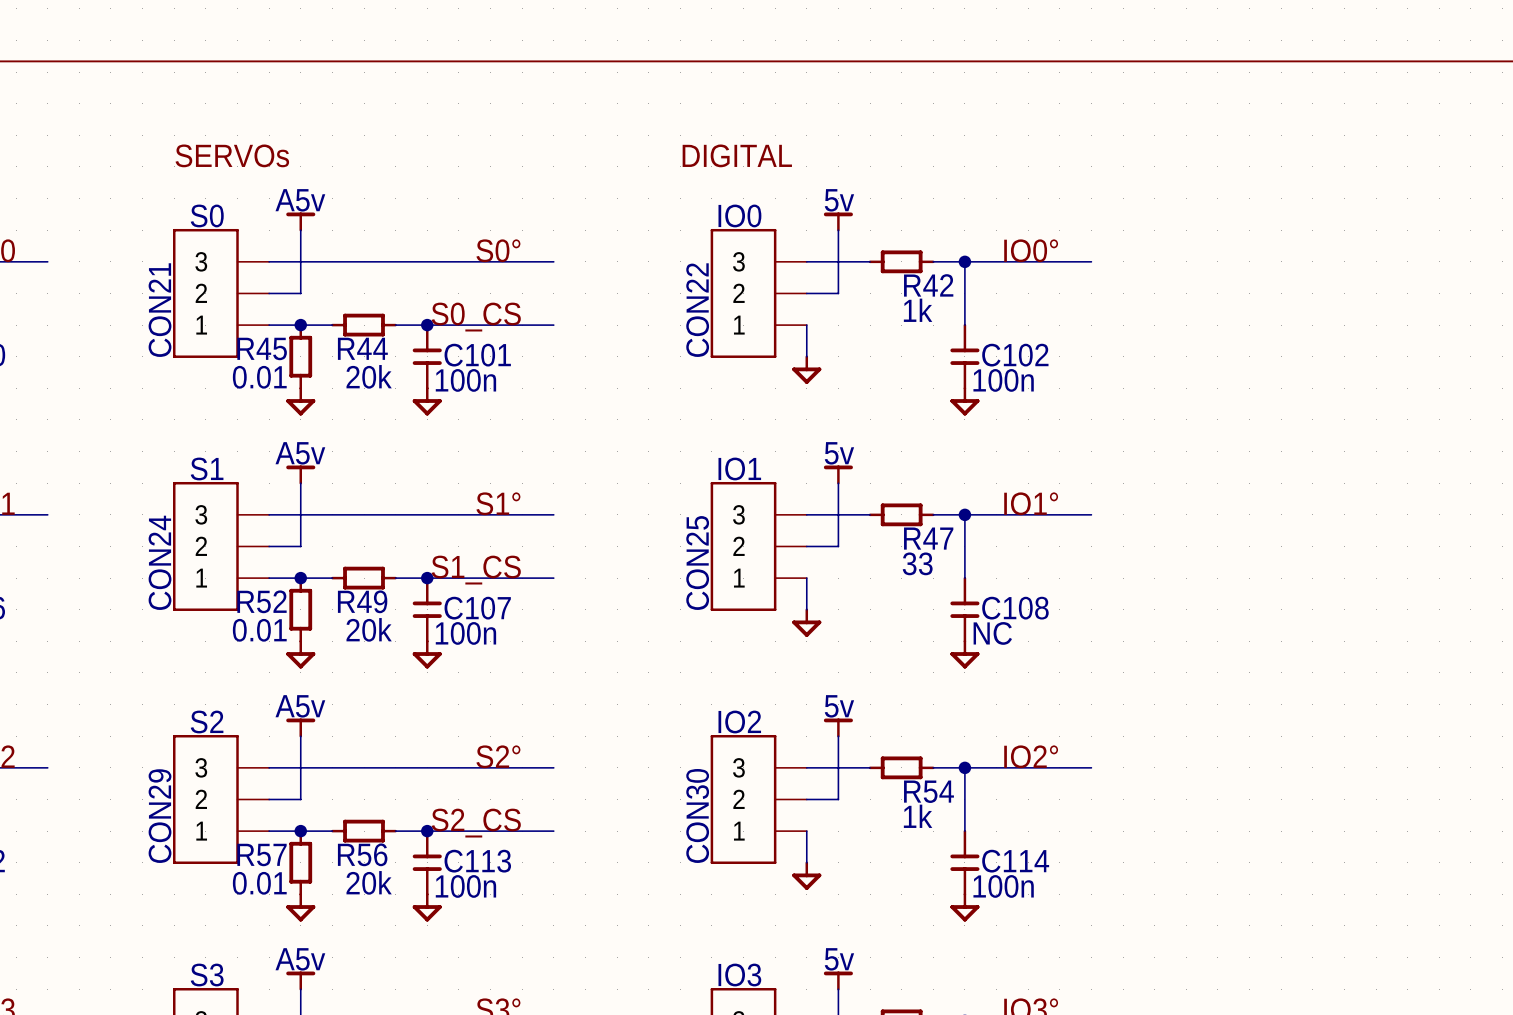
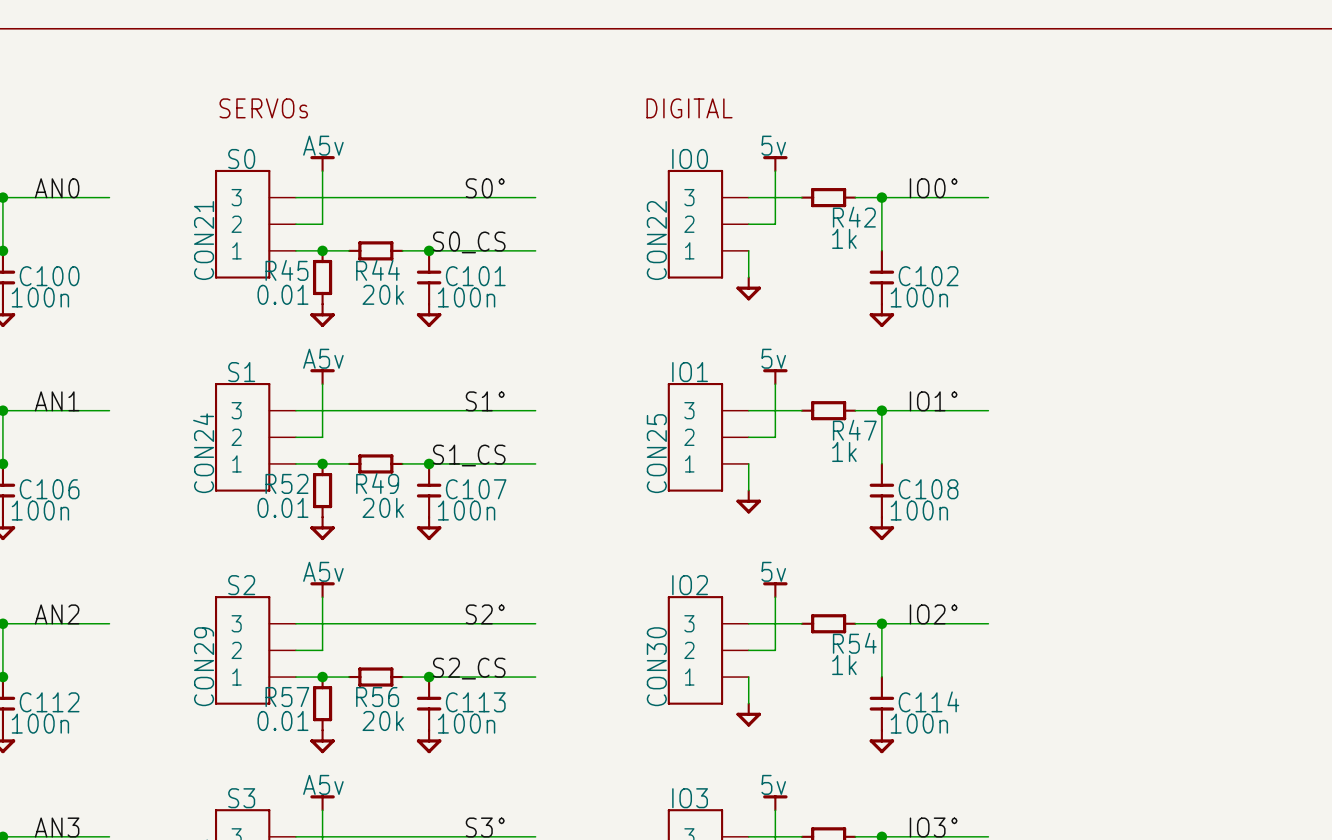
R47 value: 33 (917, 563) -> 1k (844, 451)
C108 value: NC (992, 633) -> 100n (919, 510)

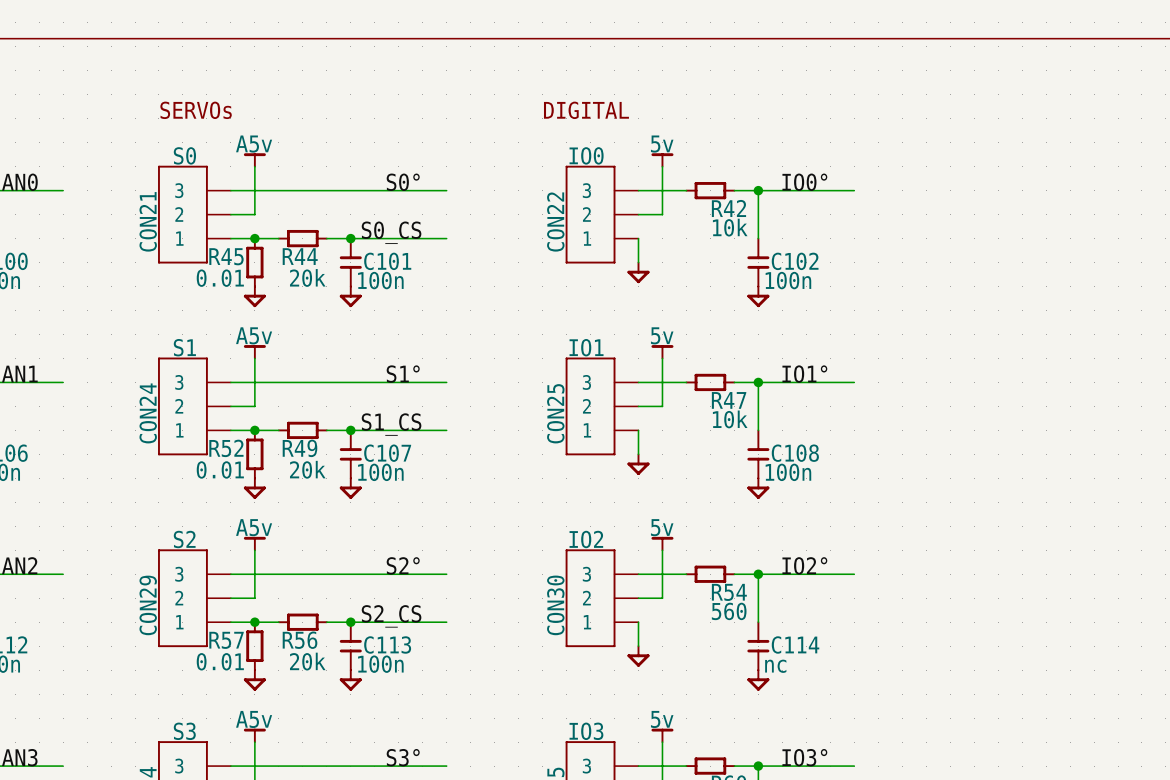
R42 value: 1k (844, 238) -> 10k (730, 227)
R47 value: 1k (844, 451) -> 10k (730, 419)
R54 value: 1k (844, 665) -> 560 (729, 611)
C114 value: 100n (919, 723) -> nc (775, 666)

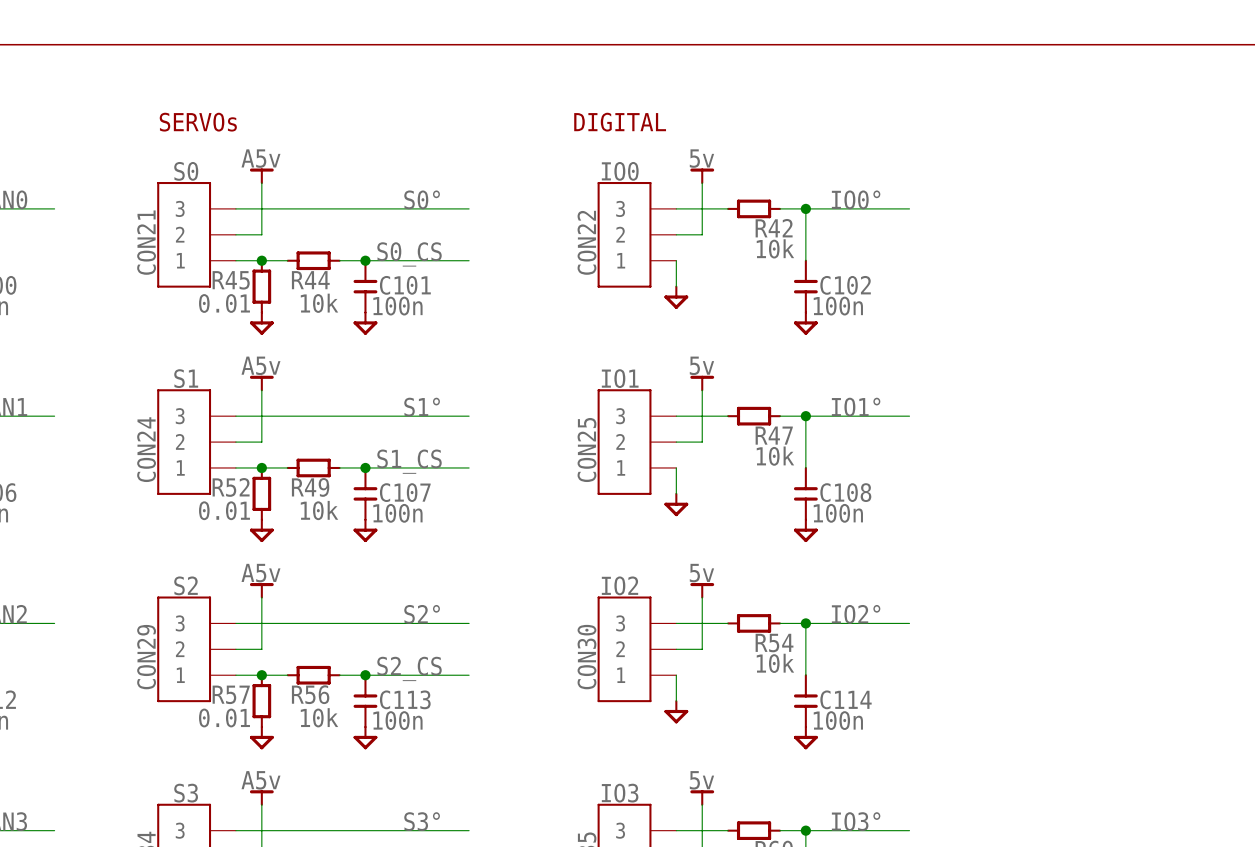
R44 value: 20k (307, 277) -> 10k (319, 303)
R49 value: 20k (307, 469) -> 10k (319, 510)
R54 value: 560 (729, 611) -> 10k (775, 663)
R56 value: 20k (307, 661) -> 10k (319, 717)
C114 value: nc (775, 666) -> 100n (838, 720)

